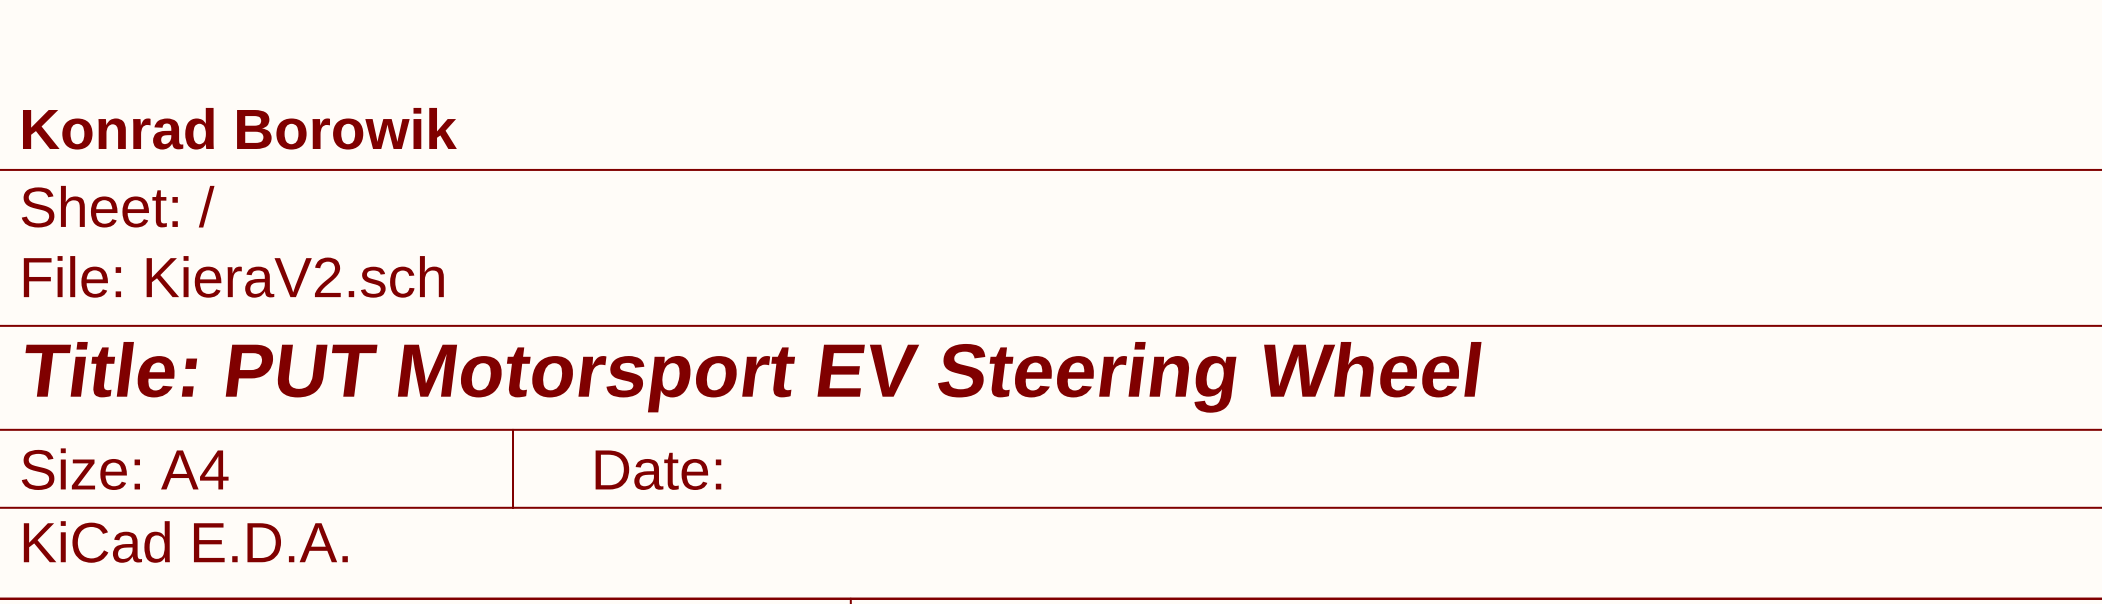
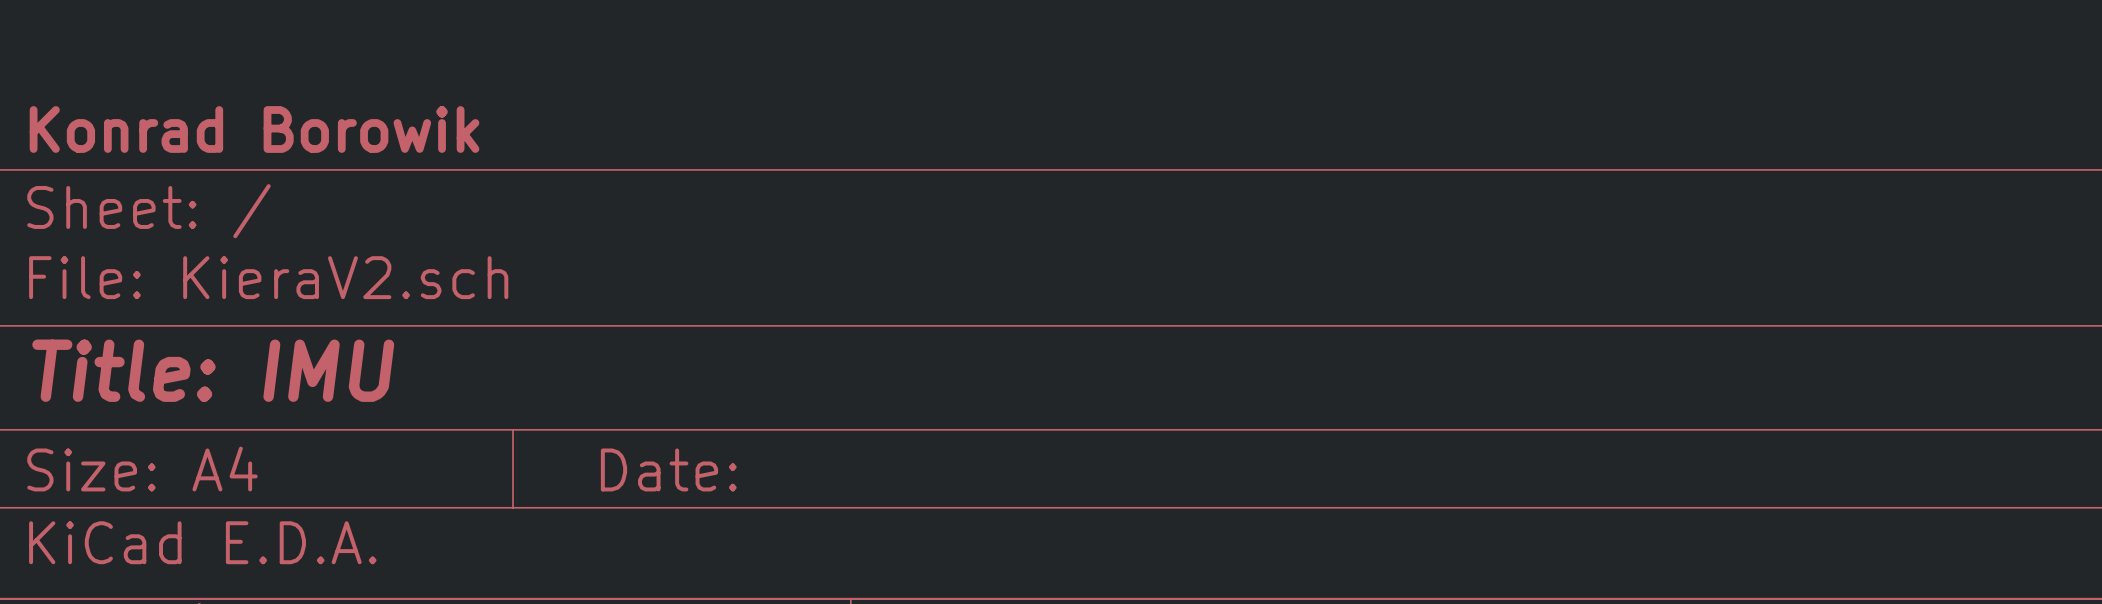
title block: Title: PUT Motorsport EV Steering Wheel (753, 377) -> Title: IMU (213, 370)

